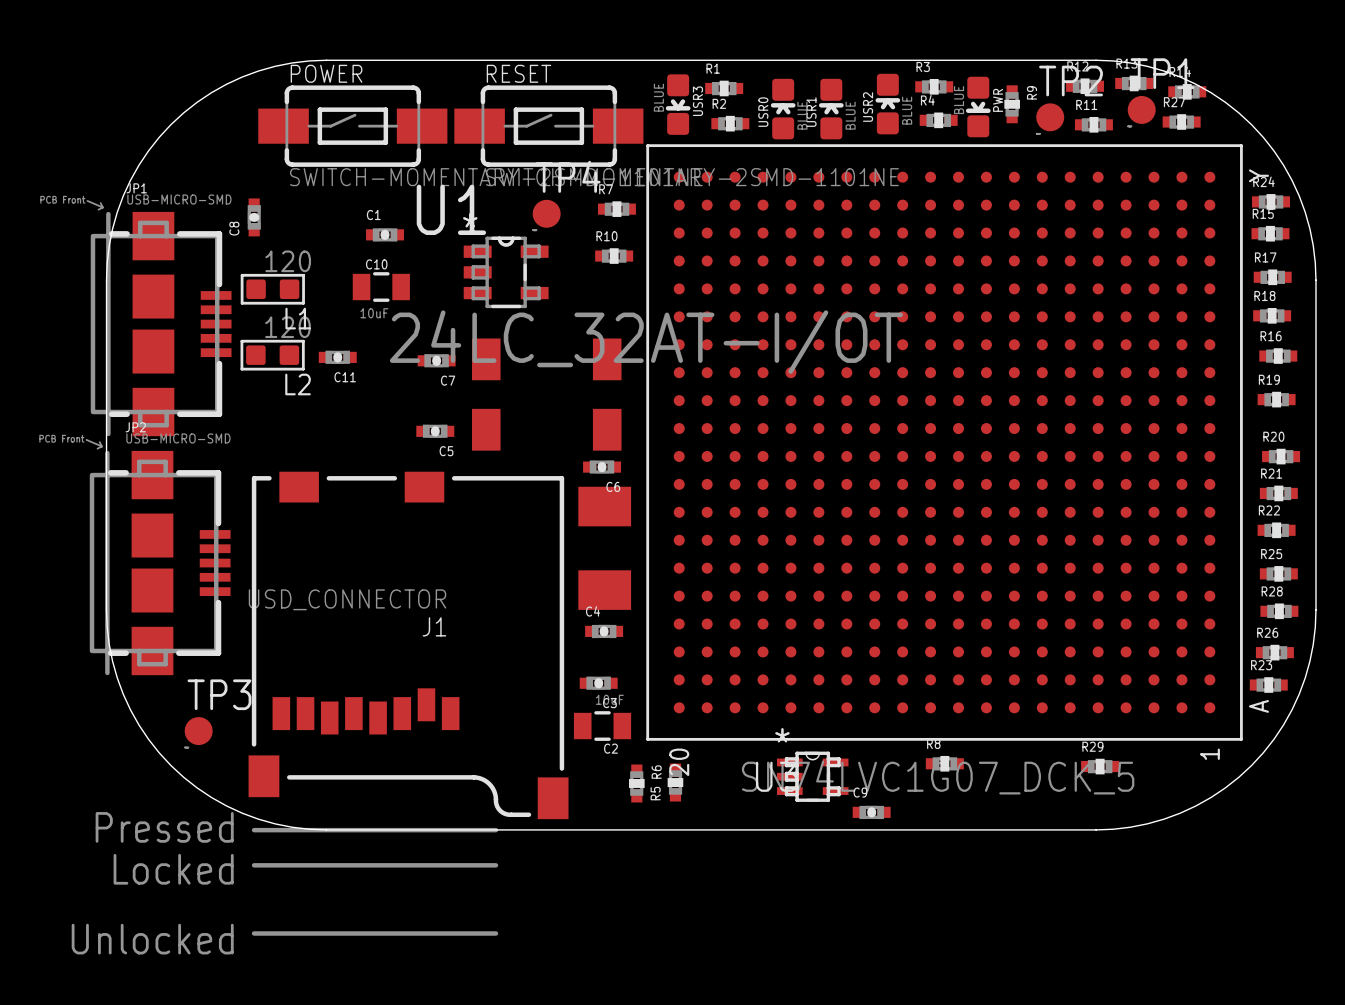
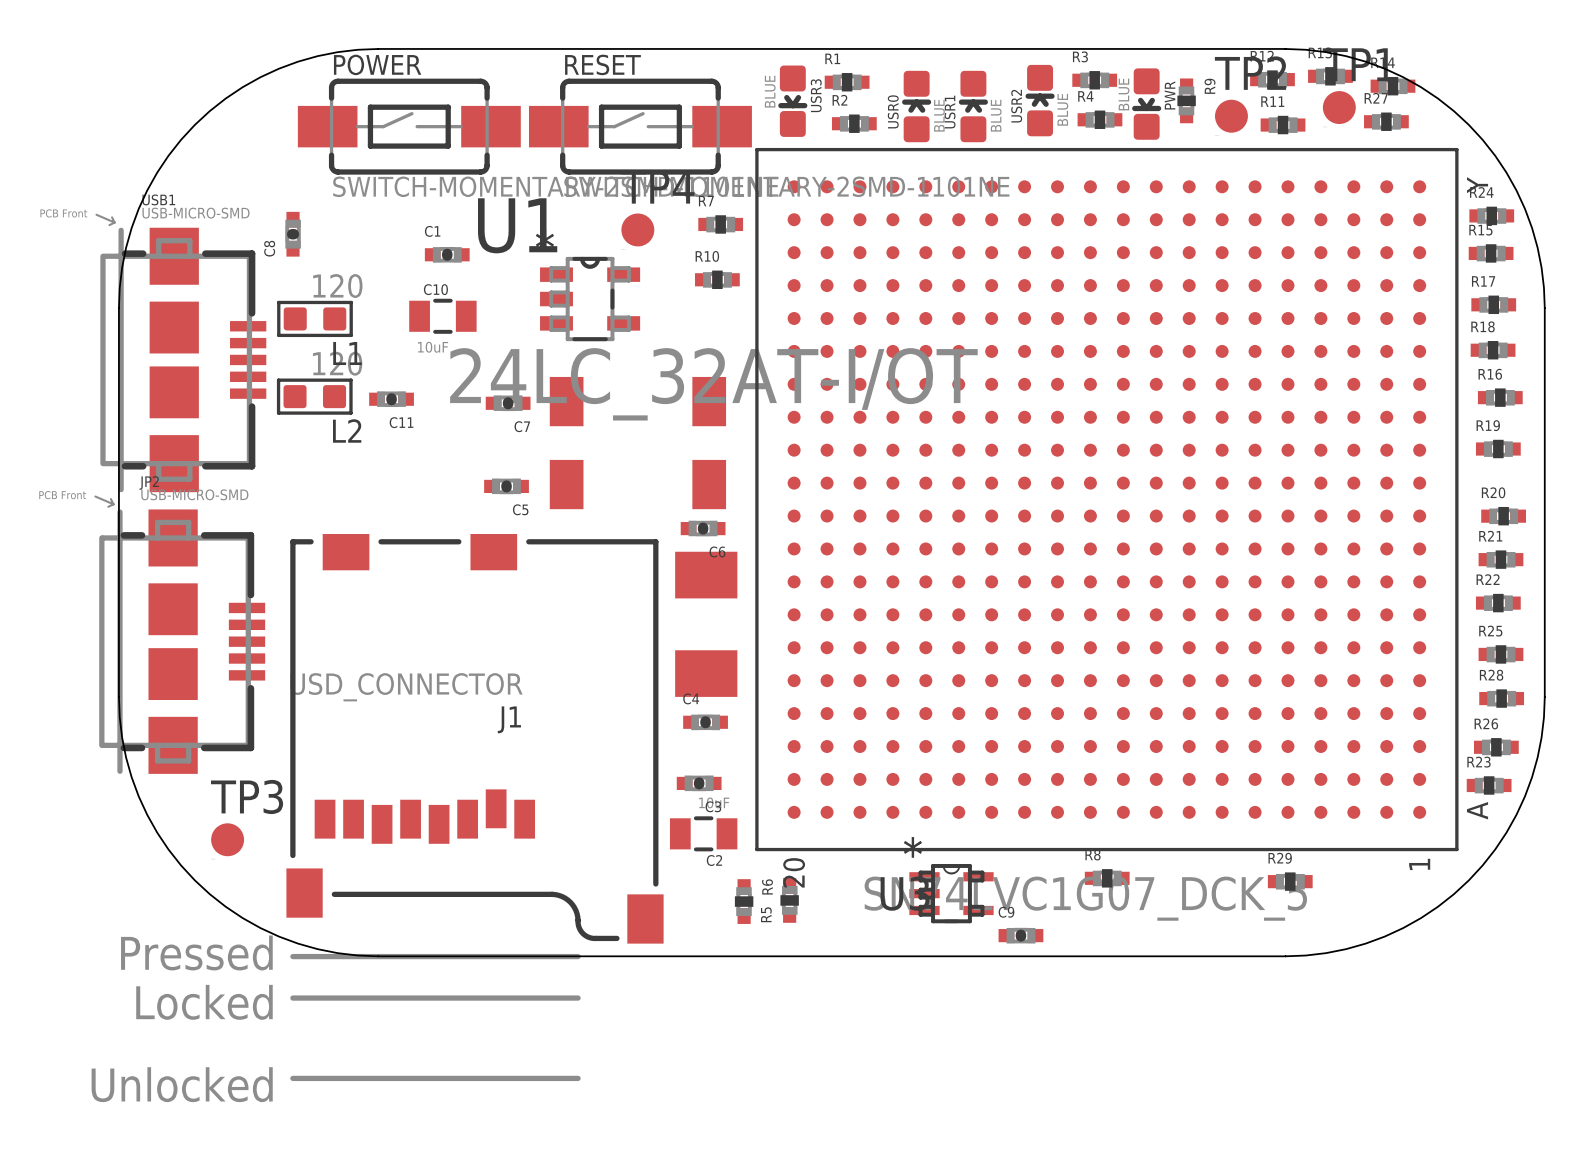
JP1 name: JP1 (136, 188) -> USB1 (158, 199)

